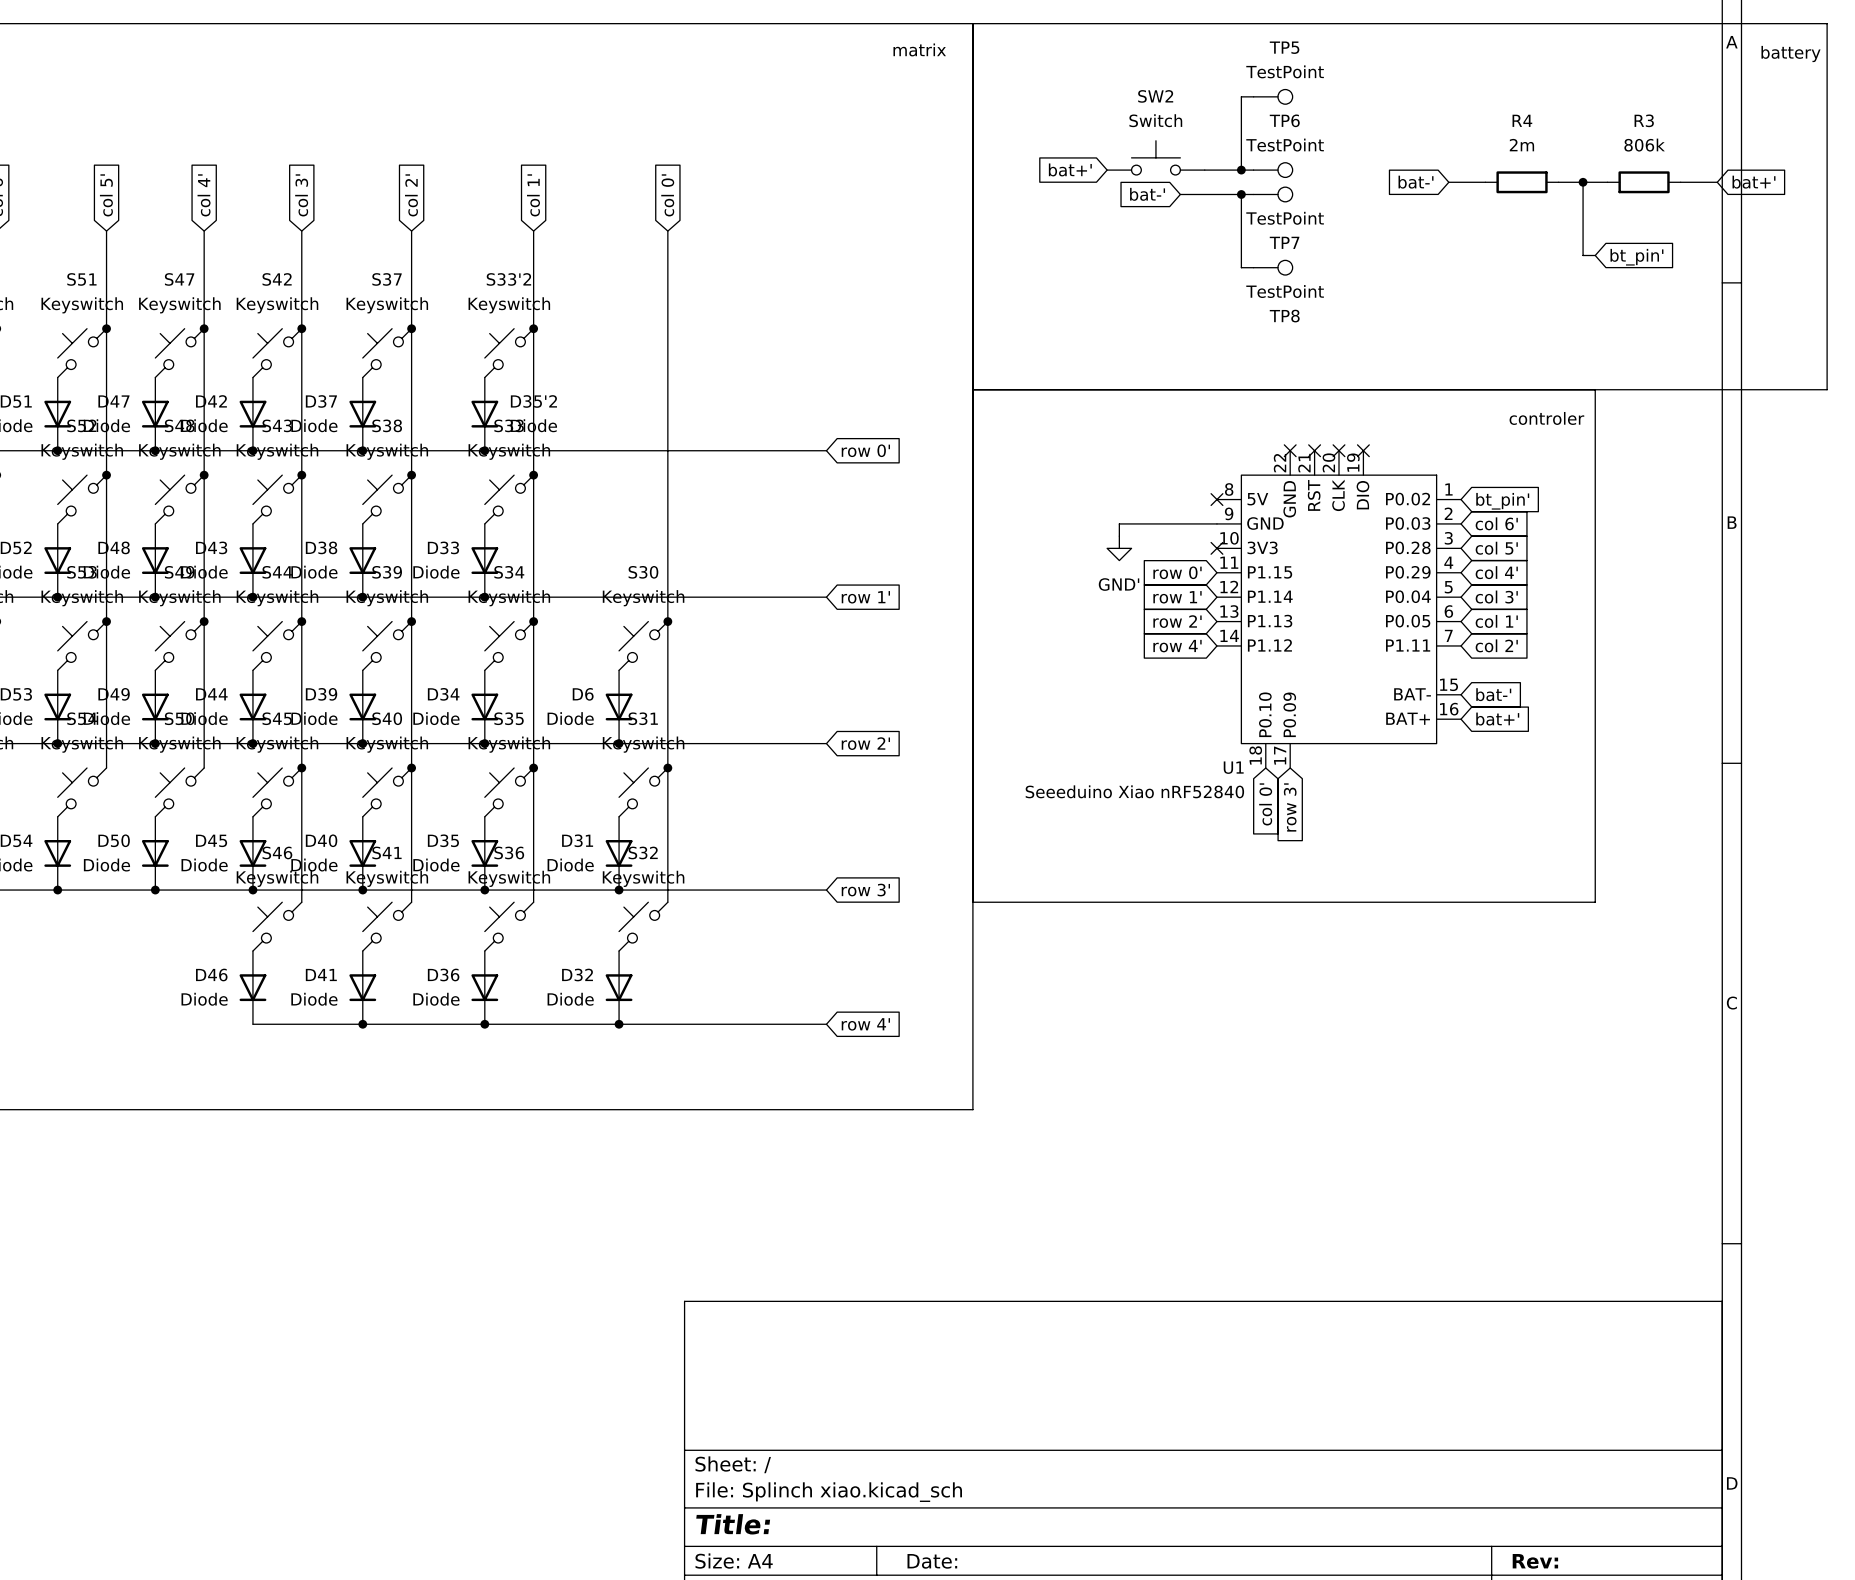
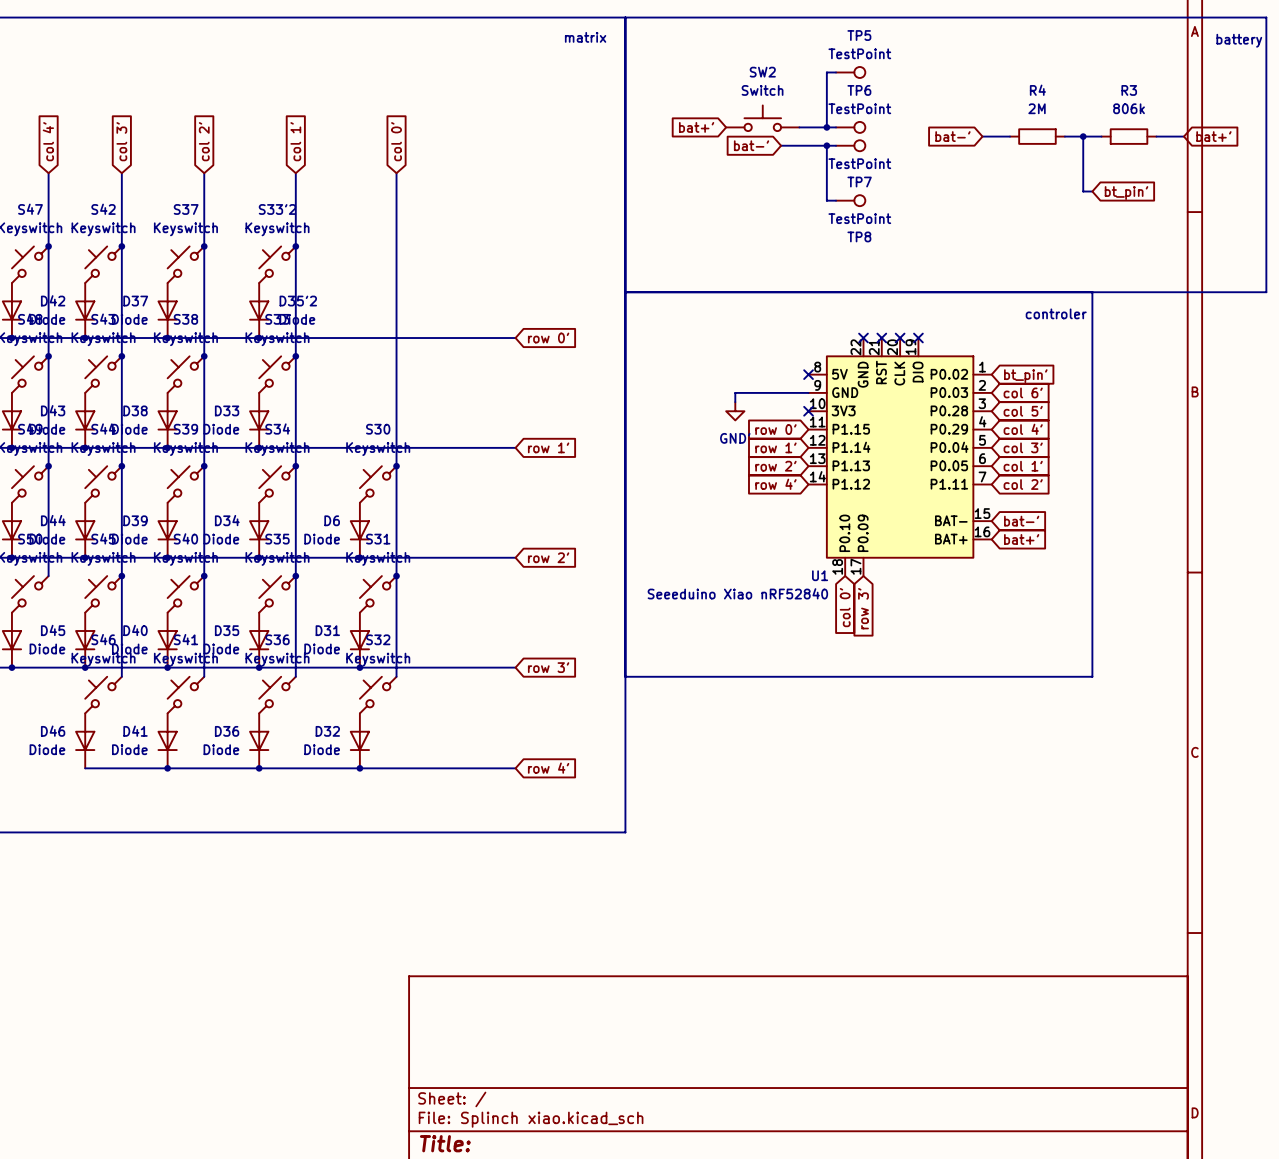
R4 value: 2m (1521, 145) -> 2M (1037, 108)

